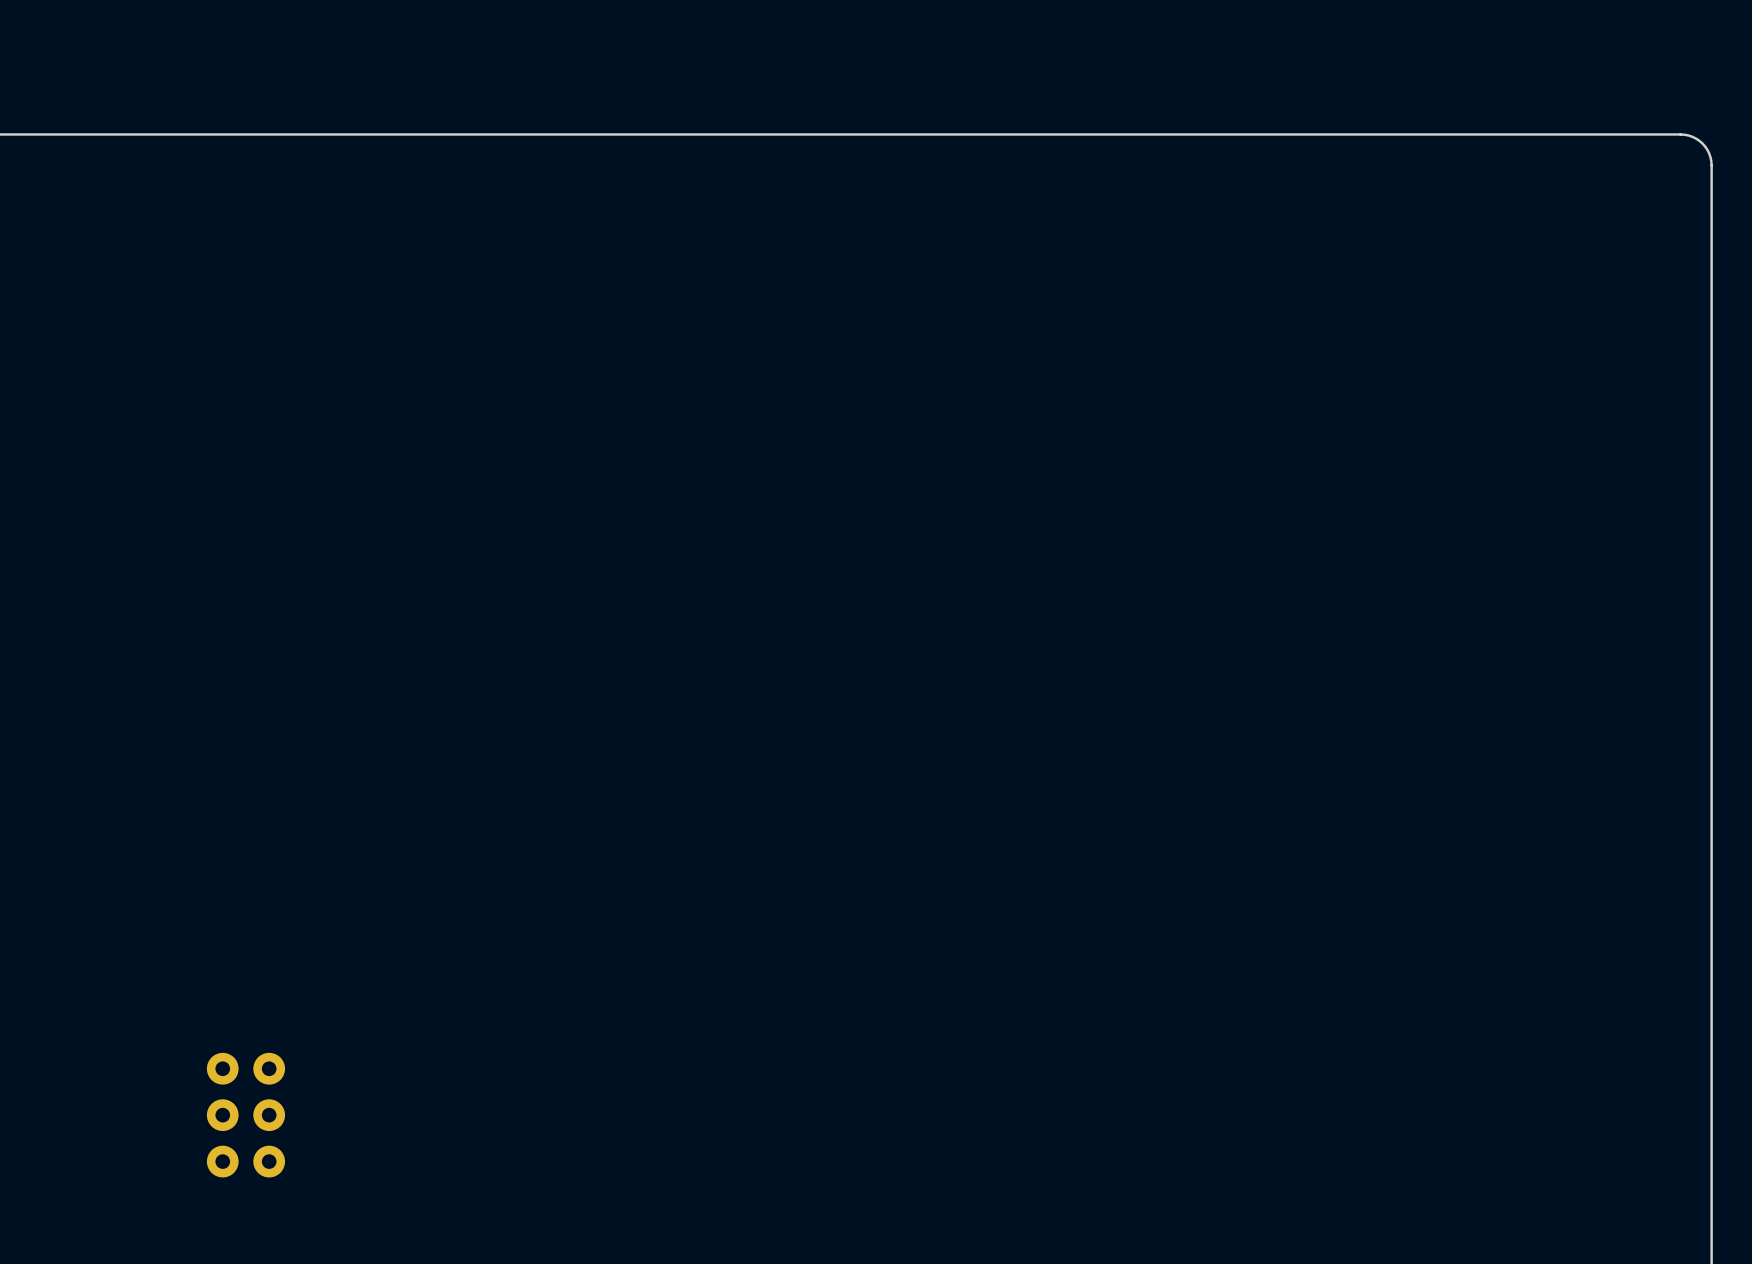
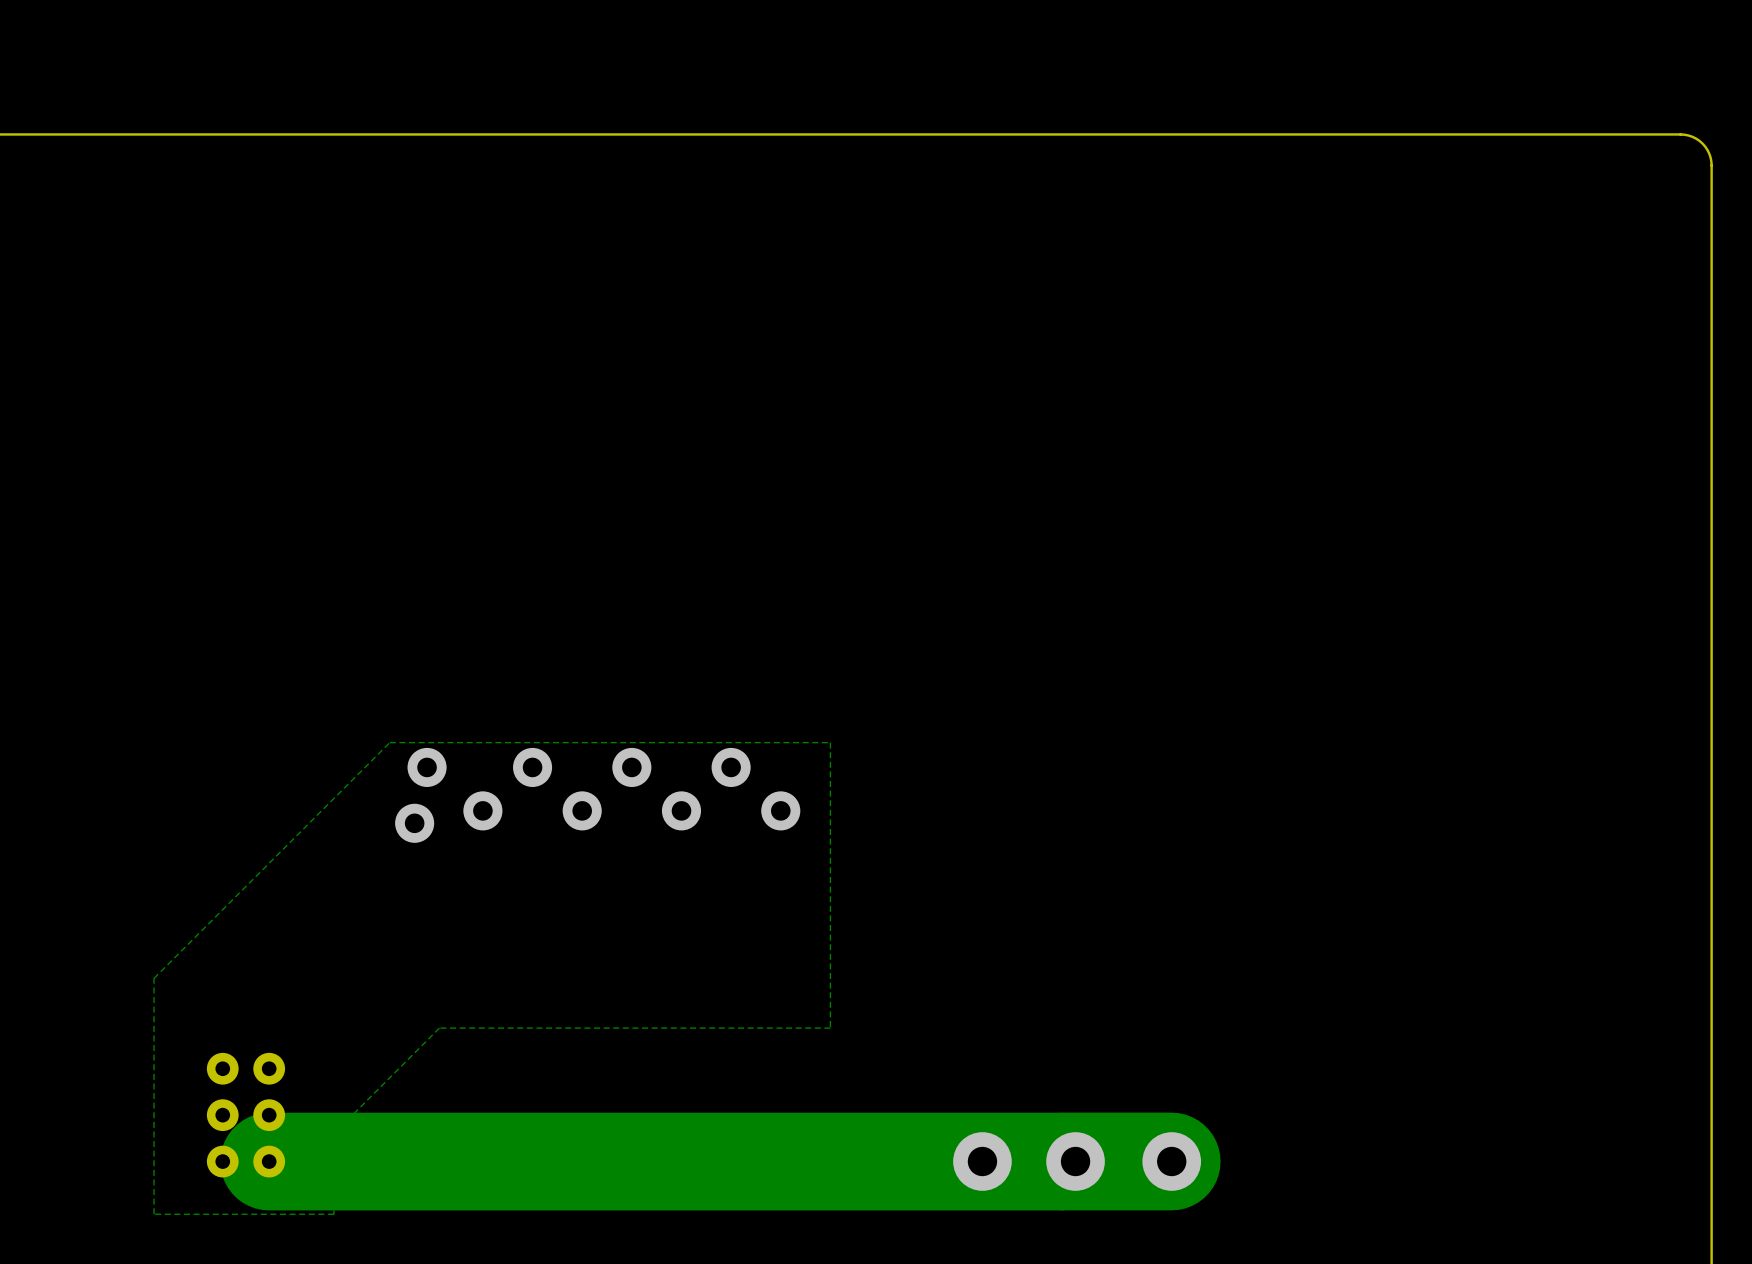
zone outline: none -> (830, 742) (830, 1028) (439, 1028) (333, 1133) (333, 1214) (154, 1214) (154, 978) (389, 742) (830, 742)
via: none -> (427, 767)
via: none -> (532, 767)
via: none -> (631, 767)
via: none -> (731, 767)
via: none -> (482, 810)
via: none -> (582, 810)
via: none -> (681, 810)
via: none -> (780, 810)
via: none -> (414, 823)
via: none -> (982, 1161)
track: none -> (1059, 1161) (269, 1161)
via: none -> (1075, 1161)
track: none -> (1171, 1161) (1063, 1161)
via: none -> (1171, 1161)

